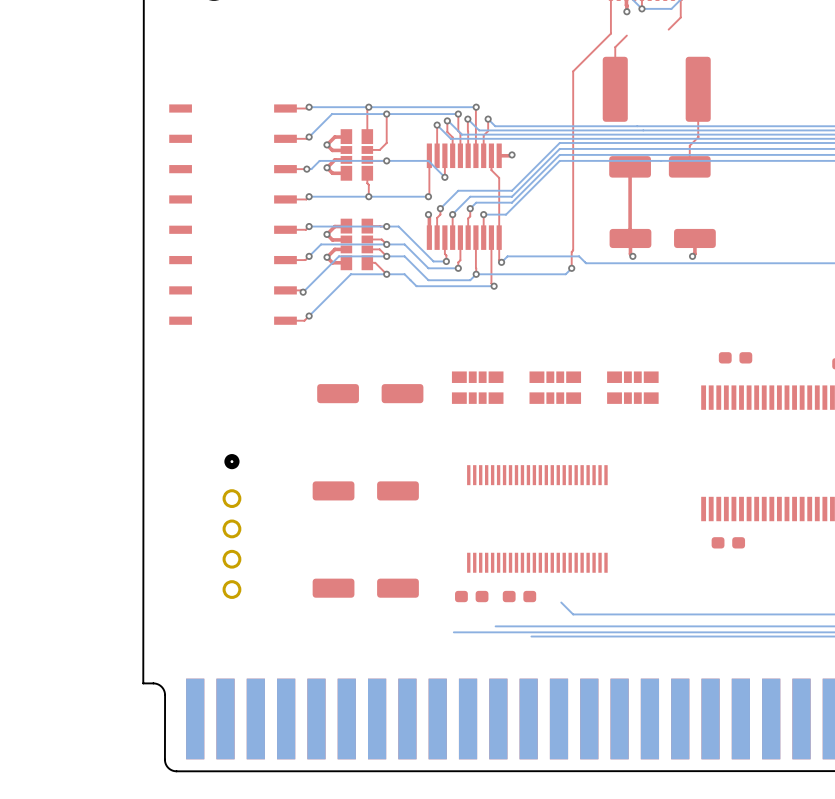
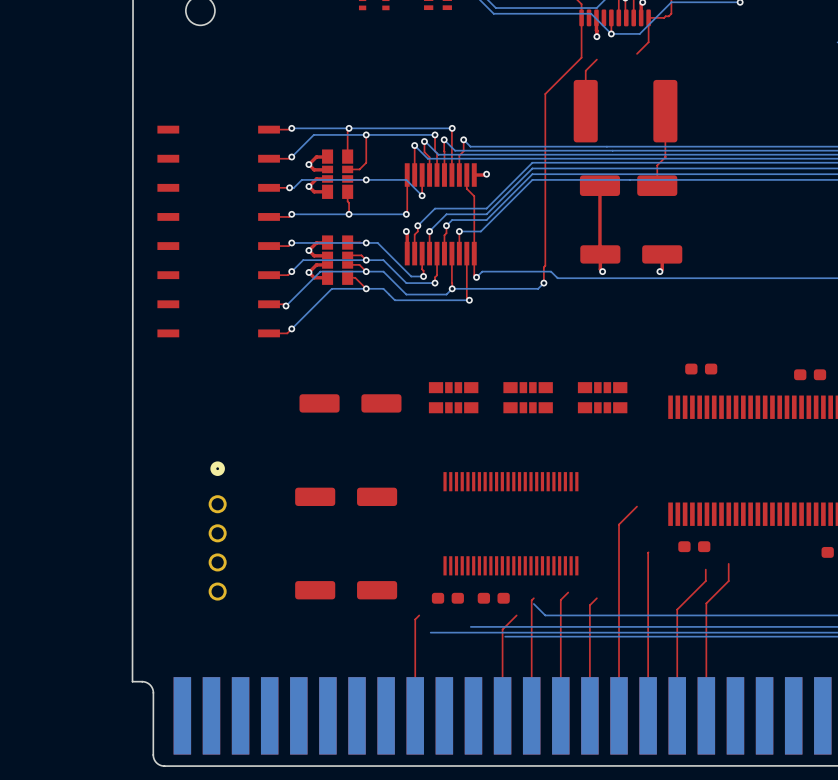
top track: none -> (637, 506) (619, 524) (619, 715)
top track: none -> (648, 552) (648, 715)
top track: none -> (728, 563) (728, 581) (706, 603) (706, 715)
top track: none -> (705, 569) (705, 581) (677, 609) (677, 715)
top track: none -> (568, 592) (560, 599) (560, 715)
top track: none -> (533, 598) (531, 600) (531, 715)
top track: none -> (596, 598) (589, 605) (589, 715)
top track: none -> (419, 615) (415, 619) (415, 715)
top track: none -> (516, 615) (502, 629) (502, 715)

